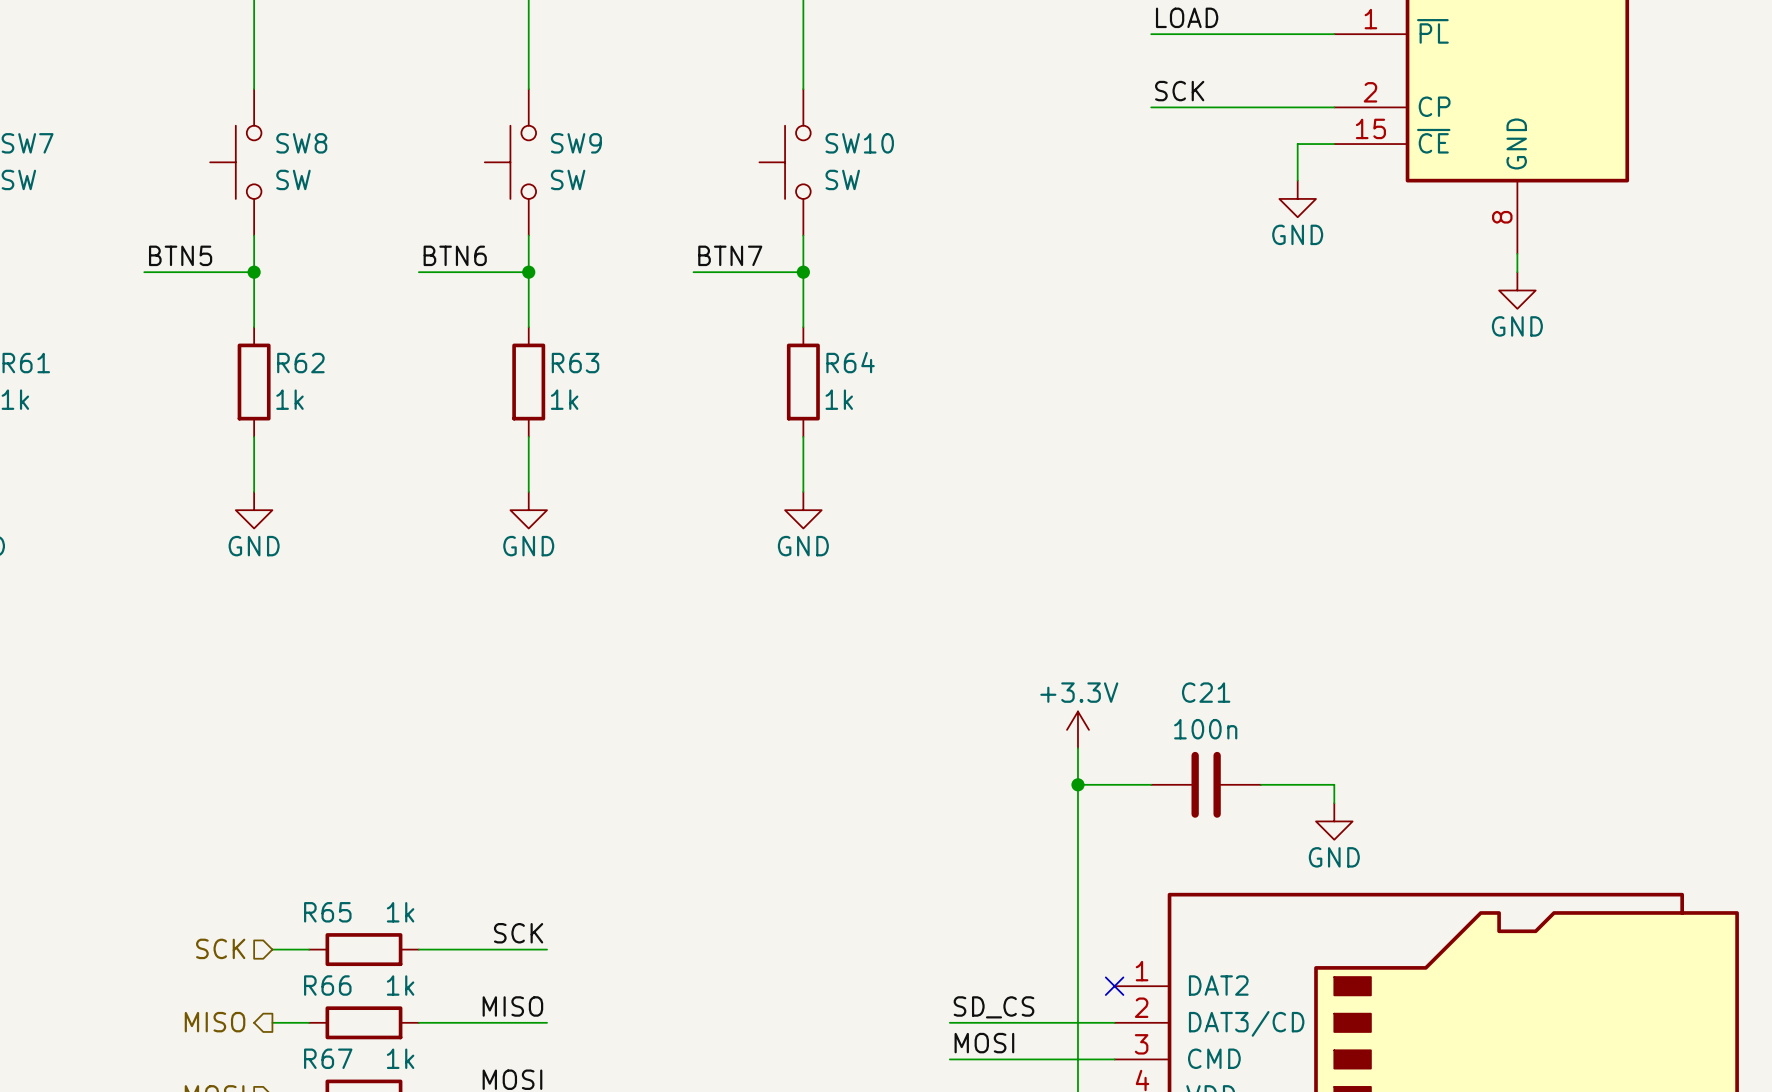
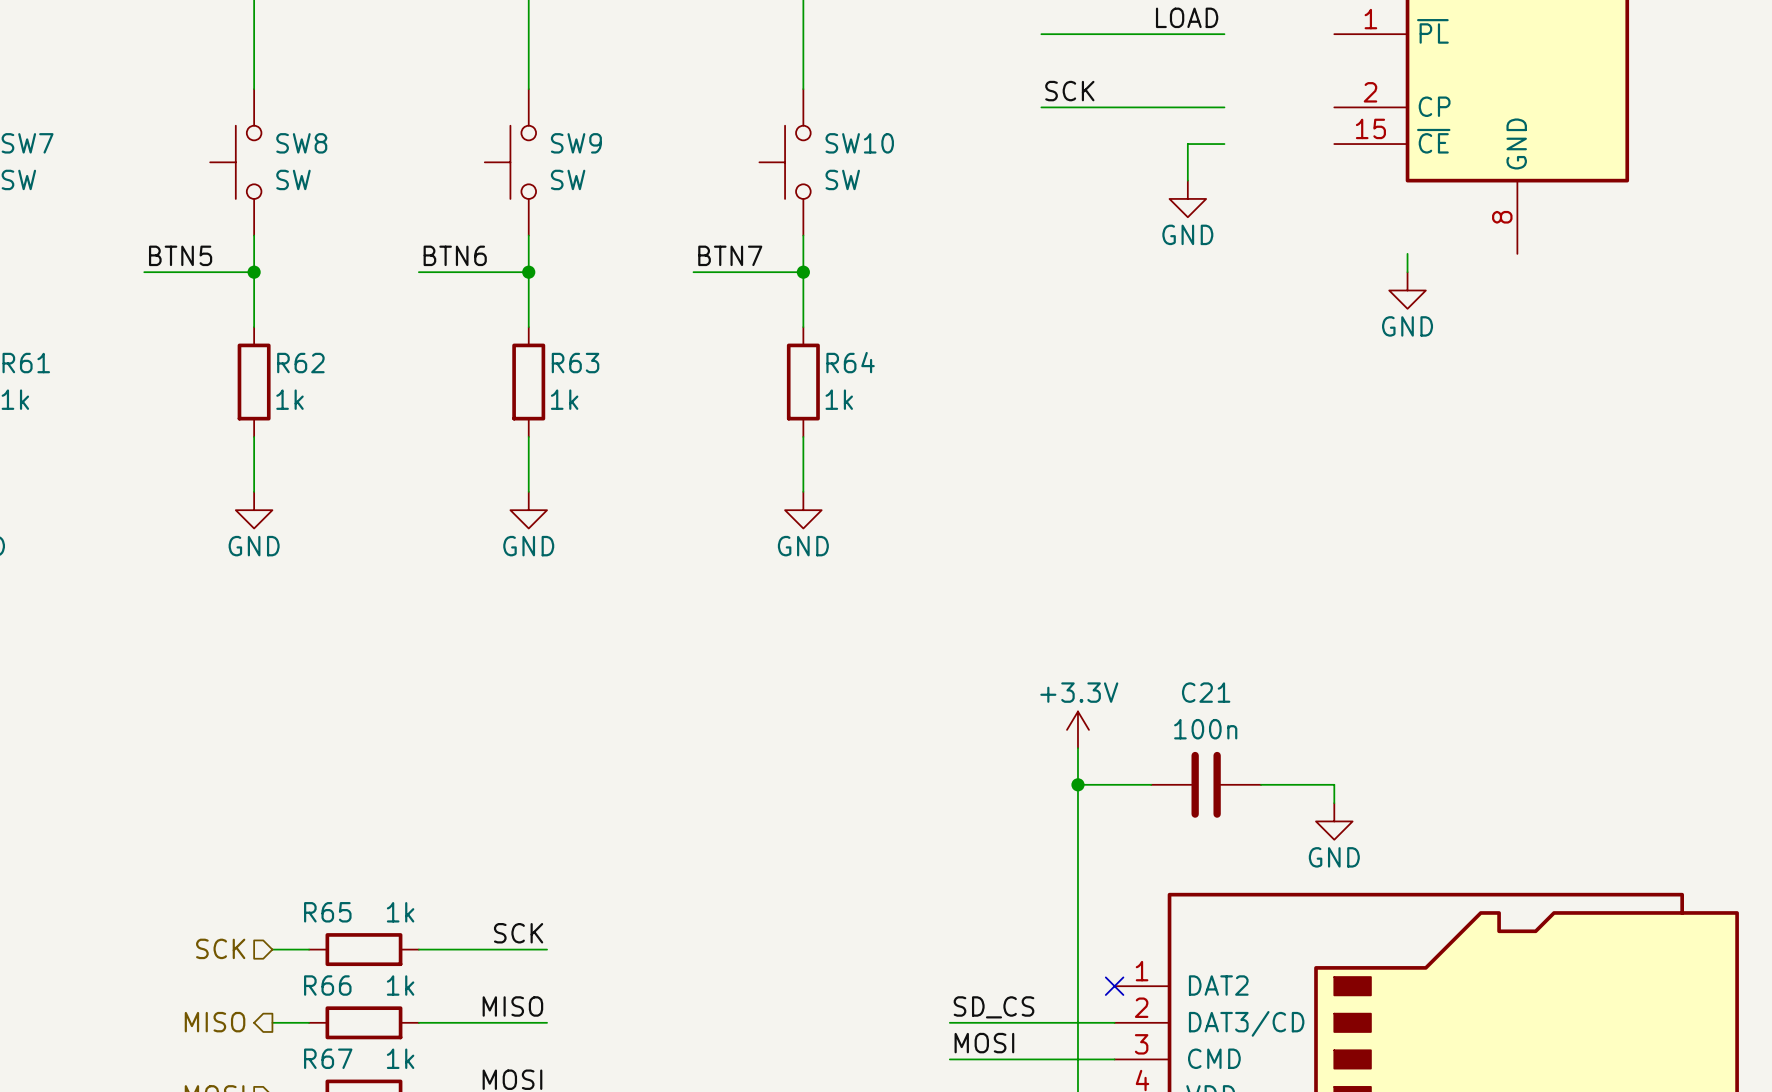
wire: (1224, 34) (1334, 34) -> (1041, 34) (1151, 34)
label position: SCK (1179, 91) -> SCK (1069, 91)
wire: (1224, 107) (1334, 107) -> (1041, 107) (1151, 107)
wire: (1334, 144) (1297, 144) (1297, 180) -> (1224, 144) (1187, 144) (1187, 180)
power symbol: none -> GND (1187, 198)
power symbol: GND (1297, 198) -> none
wire: (1517, 253) (1517, 272) -> (1407, 253) (1407, 272)
power symbol: none -> GND (1407, 290)
power symbol: GND (1517, 290) -> none

